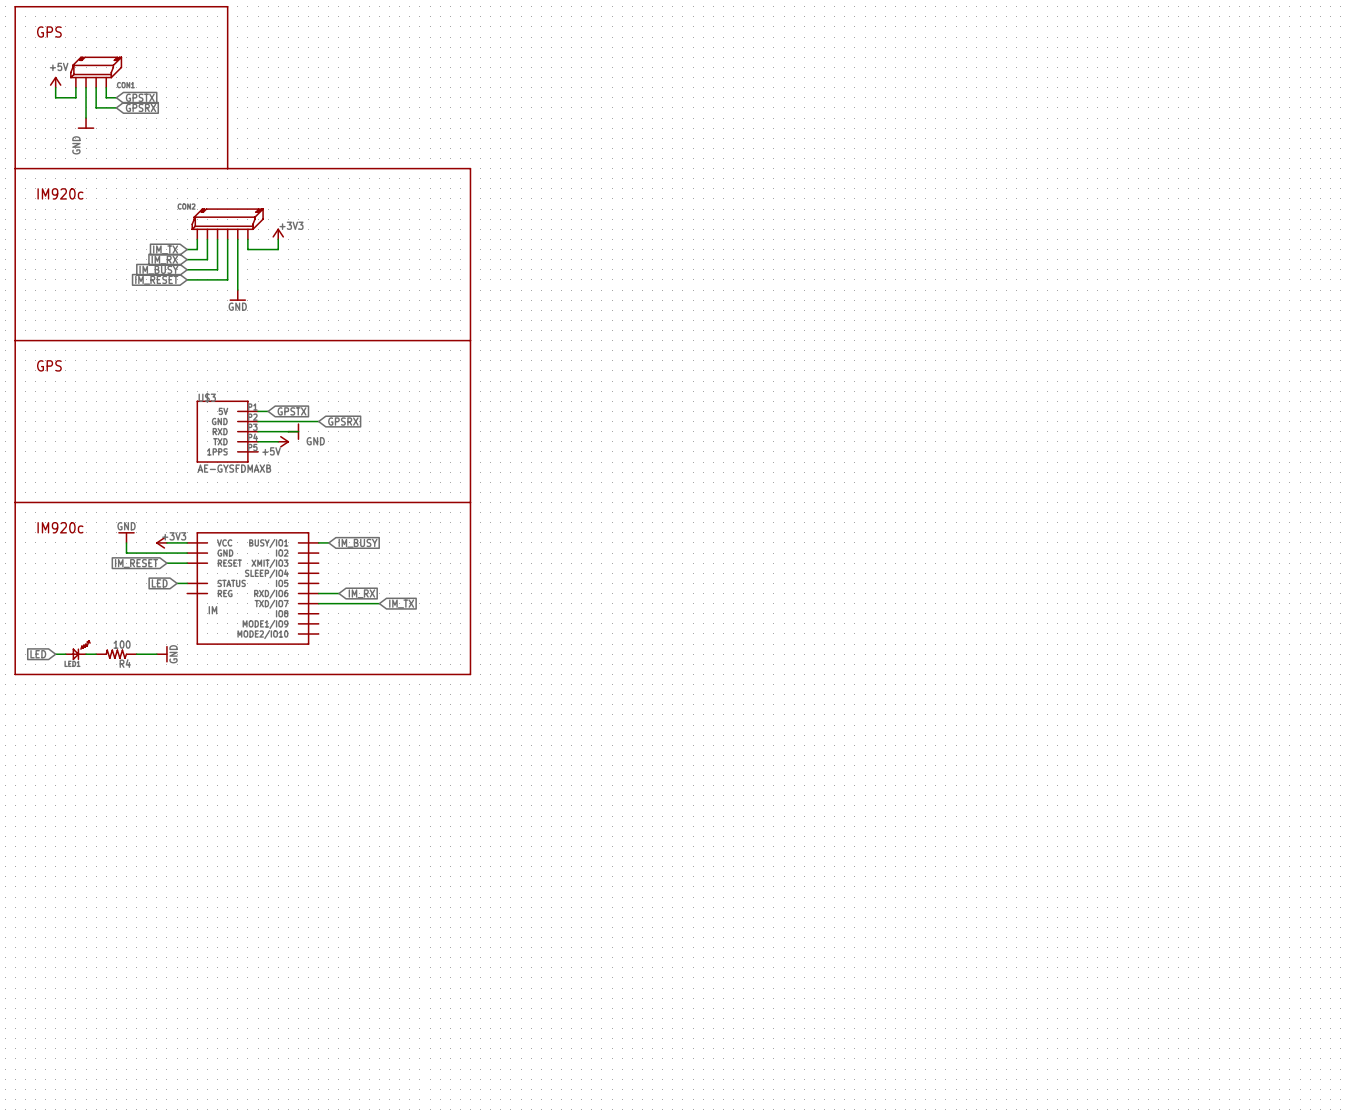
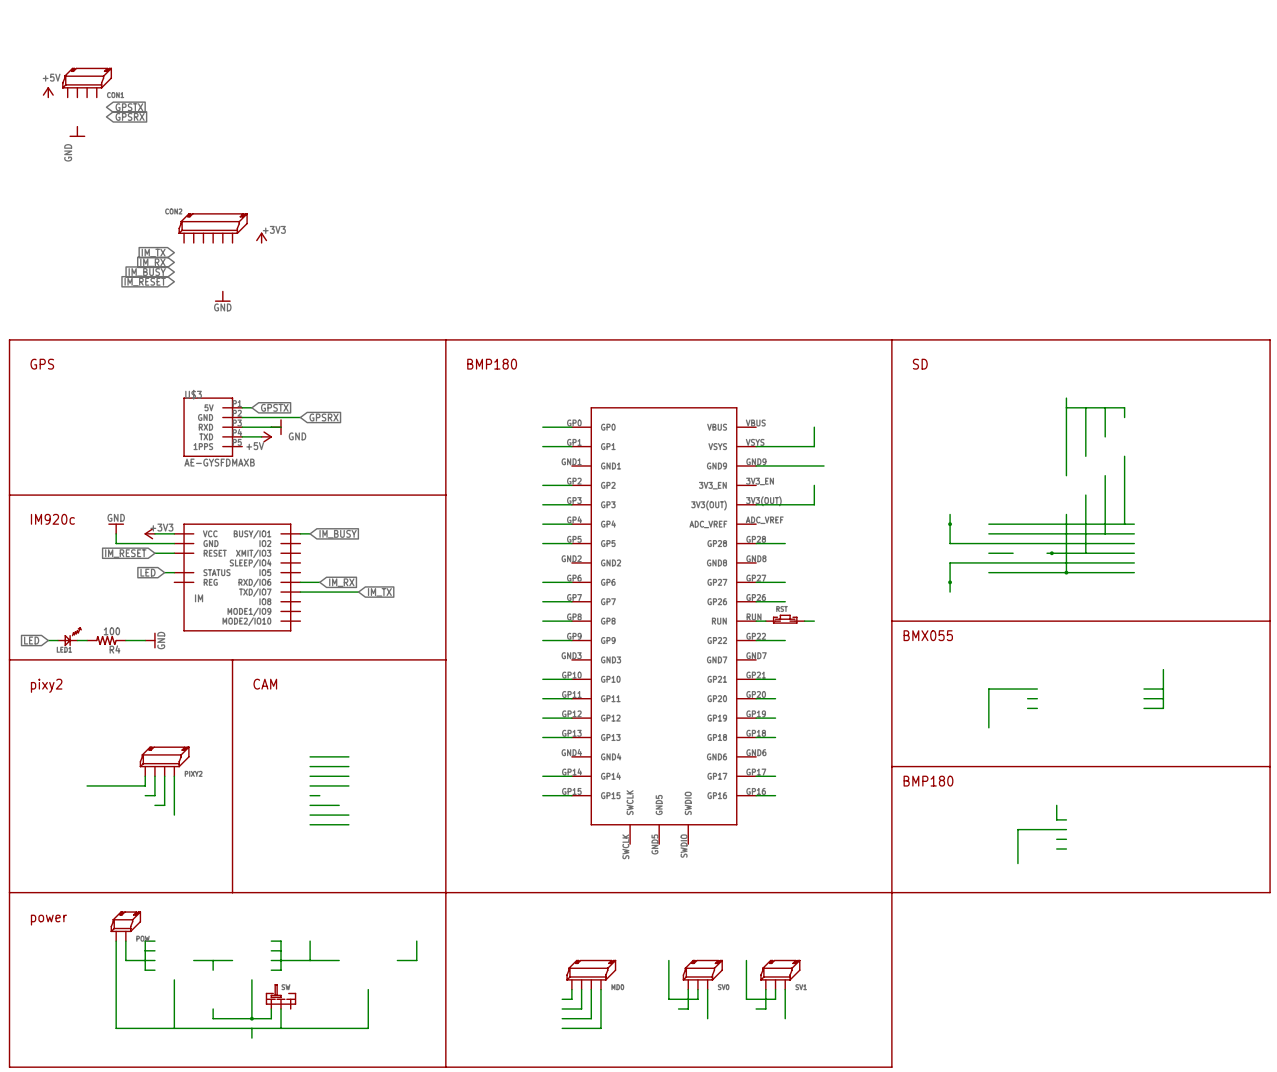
text: GPS (49, 32) -> none
wire: (55, 87) (55, 97) (75, 97) (75, 87) -> none
wire: (86, 87) (86, 118) -> none
wire: (96, 87) (96, 107) (116, 107) -> none
wire: (106, 87) (106, 97) (116, 97) -> none
line: (15, 168) (470, 168) (470, 340) -> (9, 892) (1270, 892) (1270, 339) (445, 339)
line: (227, 168) (227, 6) (15, 6) (15, 340) -> none
text: IM920c (60, 193) -> none
wire: (197, 239) (197, 249) (187, 249) -> none
wire: (207, 239) (207, 259) (187, 259) -> none
wire: (217, 239) (217, 269) (187, 269) -> none
wire: (227, 239) (227, 279) (187, 279) -> none
wire: (237, 239) (237, 290) -> none
wire: (247, 239) (247, 249) (278, 249) (278, 239) -> none
line: none -> (891, 339) (891, 1067) (9, 1067) (9, 659)
text: none -> BMP180 (492, 364)
text: none -> SD (920, 364)
wire: none -> (1066, 398) (1066, 475)
wire: none -> (1066, 407) (1124, 407) (1124, 417)
wire: none -> (1085, 407) (1085, 456)
wire: none -> (1105, 407) (1105, 436)
wire: none -> (542, 427) (571, 427)
wire: none -> (814, 427) (814, 446) (756, 446)
wire: none -> (542, 446) (571, 446)
wire: none -> (1124, 456) (1124, 524)
wire: none -> (756, 465) (824, 465)
wire: none -> (1105, 475) (1105, 533)
wire: none -> (542, 485) (571, 485)
wire: none -> (814, 485) (814, 504) (756, 504)
wire: none -> (1085, 495) (1085, 553)
wire: none -> (542, 504) (571, 504)
wire: none -> (950, 514) (950, 543) (1134, 543)
wire: none -> (1066, 514) (1066, 572)
wire: none -> (542, 524) (571, 524)
junction: none -> (950, 524)
wire: none -> (988, 524) (1134, 524)
wire: none -> (988, 533) (1134, 533)
wire: none -> (542, 543) (571, 543)
wire: none -> (756, 543) (785, 543)
wire: none -> (988, 553) (1013, 553)
wire: none -> (1047, 553) (1134, 553)
junction: none -> (1051, 553)
wire: none -> (1134, 562) (950, 562) (950, 592)
wire: none -> (988, 572) (1134, 572)
junction: none -> (1066, 572)
wire: none -> (542, 582) (571, 582)
wire: none -> (756, 582) (785, 582)
junction: none -> (950, 582)
wire: none -> (542, 601) (571, 601)
wire: none -> (756, 601) (785, 601)
part: none -> (785, 619)
wire: none -> (542, 621) (571, 621)
wire: none -> (756, 621) (765, 621)
wire: none -> (804, 621) (814, 621)
line: none -> (891, 621) (1270, 621)
part: none -> (664, 625)
text: none -> BMX055 (928, 635)
wire: none -> (542, 640) (571, 640)
wire: none -> (756, 640) (785, 640)
line: none -> (232, 659) (232, 892)
line: none -> (445, 659) (445, 1067)
wire: none -> (1163, 669) (1163, 708) (1143, 708)
wire: none -> (542, 679) (571, 679)
wire: none -> (756, 679) (775, 679)
text: none -> CAM (265, 684)
text: none -> pixy2 (46, 685)
wire: none -> (1037, 689) (988, 689) (988, 727)
wire: none -> (1143, 689) (1163, 689)
wire: none -> (542, 698) (571, 698)
wire: none -> (756, 698) (775, 698)
wire: none -> (1027, 698) (1037, 698)
wire: none -> (1143, 698) (1163, 698)
wire: none -> (1027, 708) (1037, 708)
wire: none -> (542, 718) (571, 718)
wire: none -> (756, 718) (775, 718)
wire: none -> (542, 737) (571, 737)
wire: none -> (756, 737) (775, 737)
wire: none -> (310, 756) (348, 756)
part: none -> (164, 761)
wire: none -> (310, 766) (348, 766)
line: none -> (891, 766) (1270, 766)
wire: none -> (145, 776) (145, 785) (87, 785)
wire: none -> (154, 776) (154, 795) (145, 795)
wire: none -> (164, 776) (164, 805) (154, 805)
wire: none -> (174, 776) (174, 815)
wire: none -> (310, 776) (348, 776)
wire: none -> (542, 776) (571, 776)
wire: none -> (756, 776) (775, 776)
text: none -> BMP180 (928, 781)
wire: none -> (310, 785) (348, 785)
wire: none -> (310, 795) (319, 795)
wire: none -> (542, 795) (571, 795)
wire: none -> (756, 795) (775, 795)
wire: none -> (310, 805) (339, 805)
wire: none -> (1056, 805) (1056, 819) (1066, 819)
wire: none -> (310, 815) (348, 815)
wire: none -> (310, 824) (348, 824)
wire: none -> (1066, 829) (1017, 829) (1017, 863)
wire: none -> (1056, 839) (1066, 839)
wire: none -> (1056, 849) (1066, 849)
text: none -> power (48, 920)
part: none -> (125, 926)
wire: none -> (116, 941) (116, 1028) (368, 1028) (368, 989)
wire: none -> (125, 941) (125, 960) (154, 960)
wire: none -> (154, 941) (145, 941) (145, 970) (154, 970)
wire: none -> (271, 941) (281, 941) (281, 970) (271, 970)
wire: none -> (310, 941) (310, 960)
wire: none -> (416, 941) (416, 960) (397, 960)
wire: none -> (145, 950) (154, 950)
wire: none -> (271, 950) (281, 950)
wire: none -> (193, 960) (232, 960)
wire: none -> (213, 960) (213, 970)
wire: none -> (271, 960) (339, 960)
wire: none -> (668, 960) (668, 999) (697, 999) (697, 989)
wire: none -> (746, 960) (746, 999) (775, 999) (775, 989)
part: none -> (591, 974)
part: none -> (702, 974)
part: none -> (780, 974)
wire: none -> (174, 979) (174, 1028)
wire: none -> (251, 979) (251, 1018)
wire: none -> (571, 989) (571, 999) (562, 999)
wire: none -> (581, 989) (581, 1008) (562, 1008)
wire: none -> (591, 989) (591, 1018) (562, 1018)
wire: none -> (600, 989) (600, 1028) (562, 1028)
wire: none -> (688, 989) (688, 1008) (678, 1008)
wire: none -> (707, 989) (707, 1018)
wire: none -> (765, 989) (765, 1008) (756, 1008)
wire: none -> (785, 989) (785, 1018)
part: none -> (281, 996)
wire: none -> (213, 1008) (213, 1018) (271, 1018) (271, 1008)
wire: none -> (281, 1008) (281, 1028)
junction: none -> (251, 1018)
wire: none -> (251, 1028) (251, 1038)

